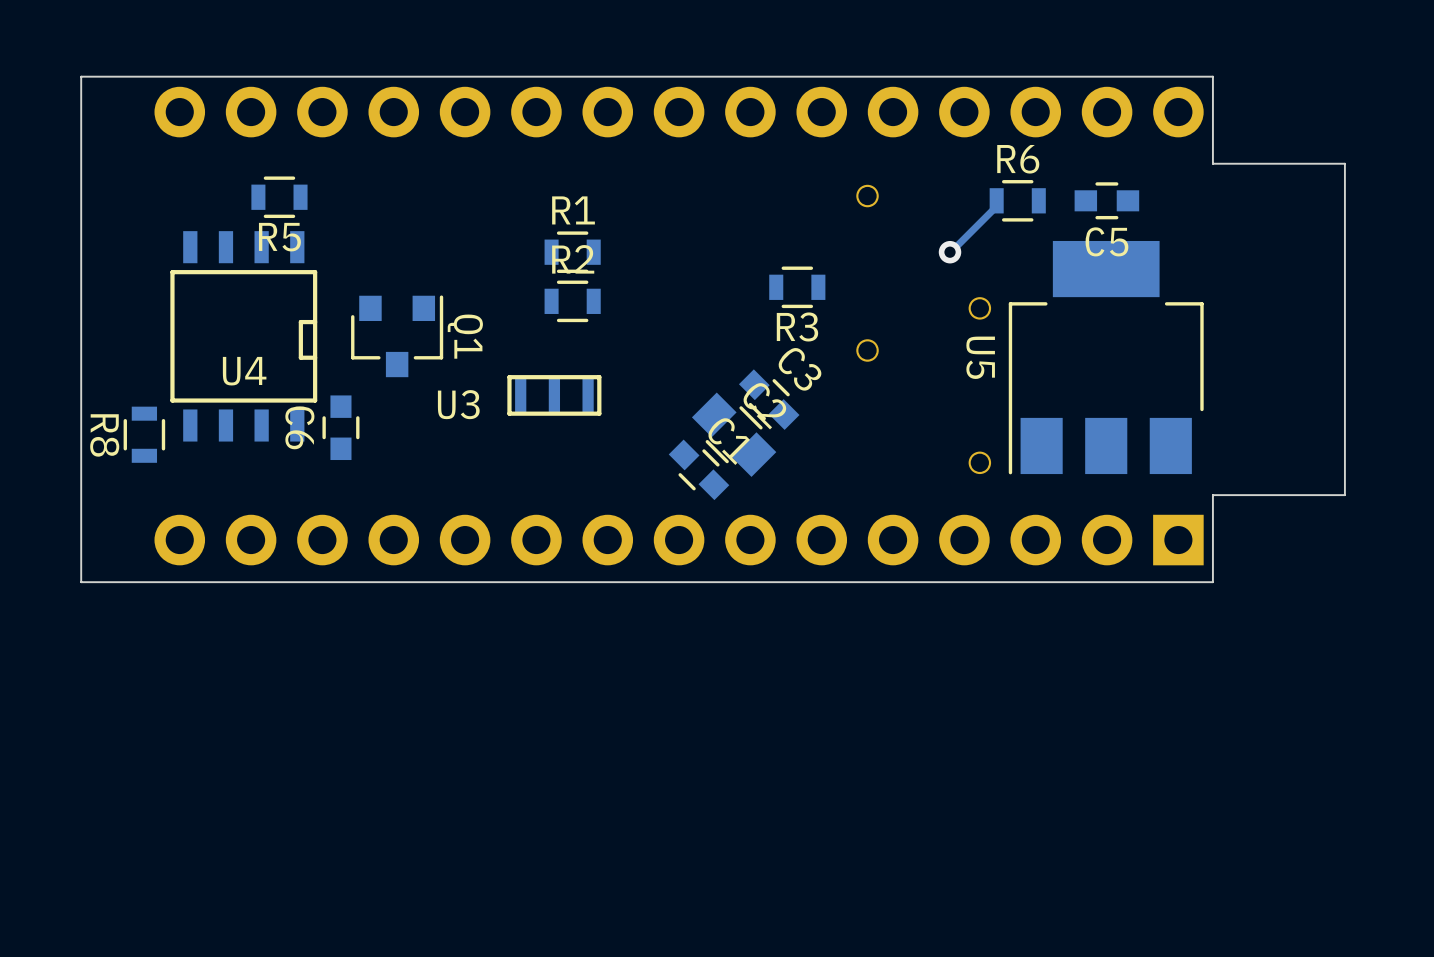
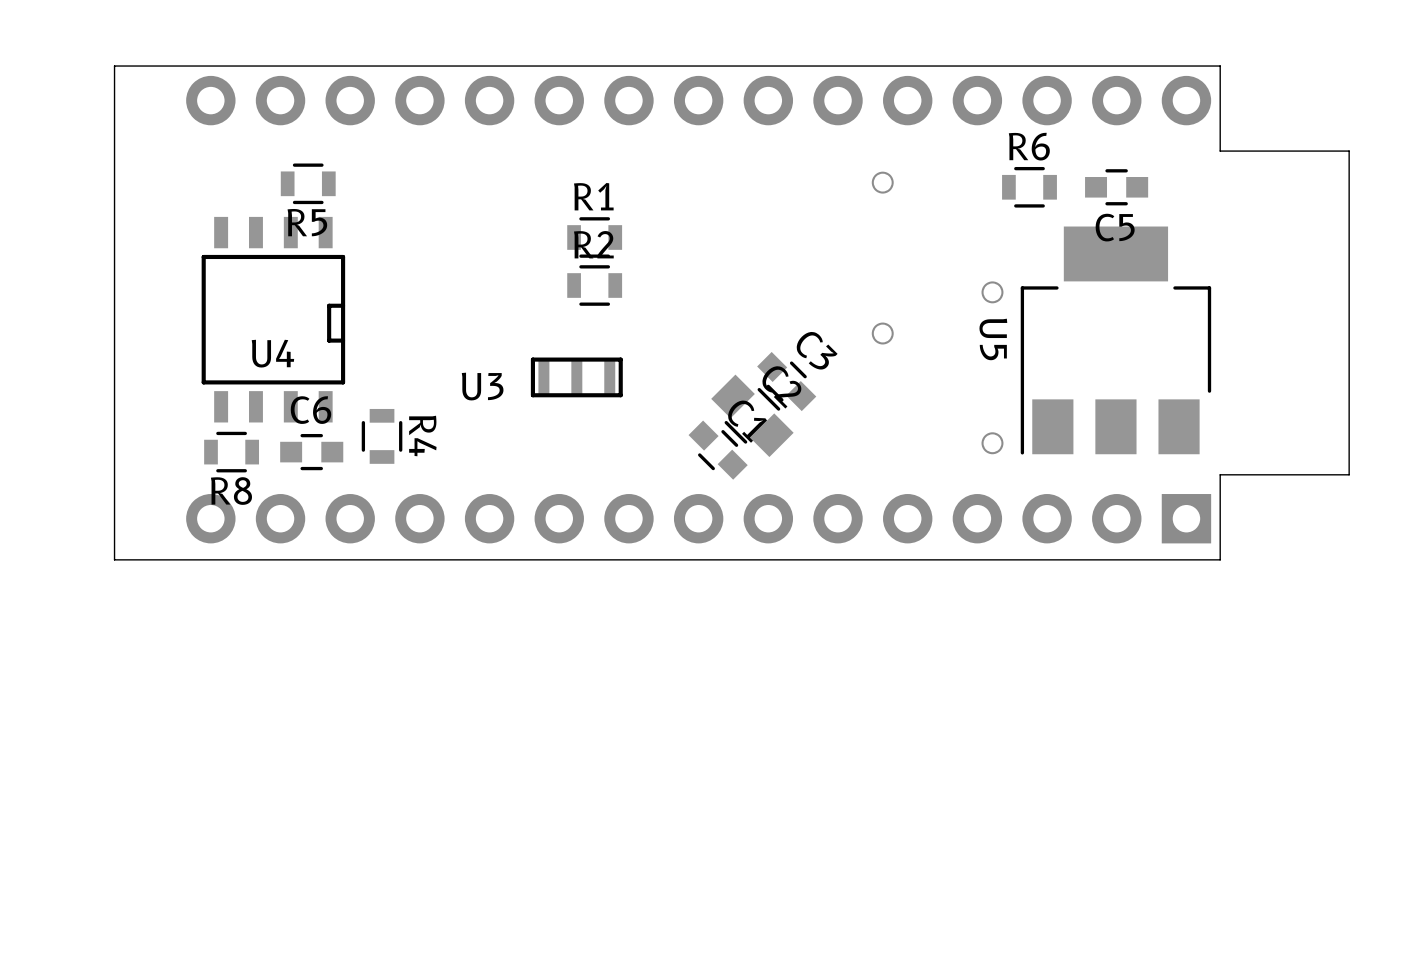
track: (996, 200) (996, 206) (950, 252) -> none
via: (950, 252) -> none
R3: (797, 287) -> none
Q1: (397, 336) -> none
C6 rotation: 0° (340, 427) -> 90° clockwise (311, 452)
C6 position: (340, 427) -> (311, 452)
R8 rotation: 0° (144, 434) -> 90° clockwise (231, 452)
R8 position: (144, 434) -> (231, 452)
R8 name position: R8 (104, 435) -> R8 (231, 491)
R4: none -> (382, 436)

